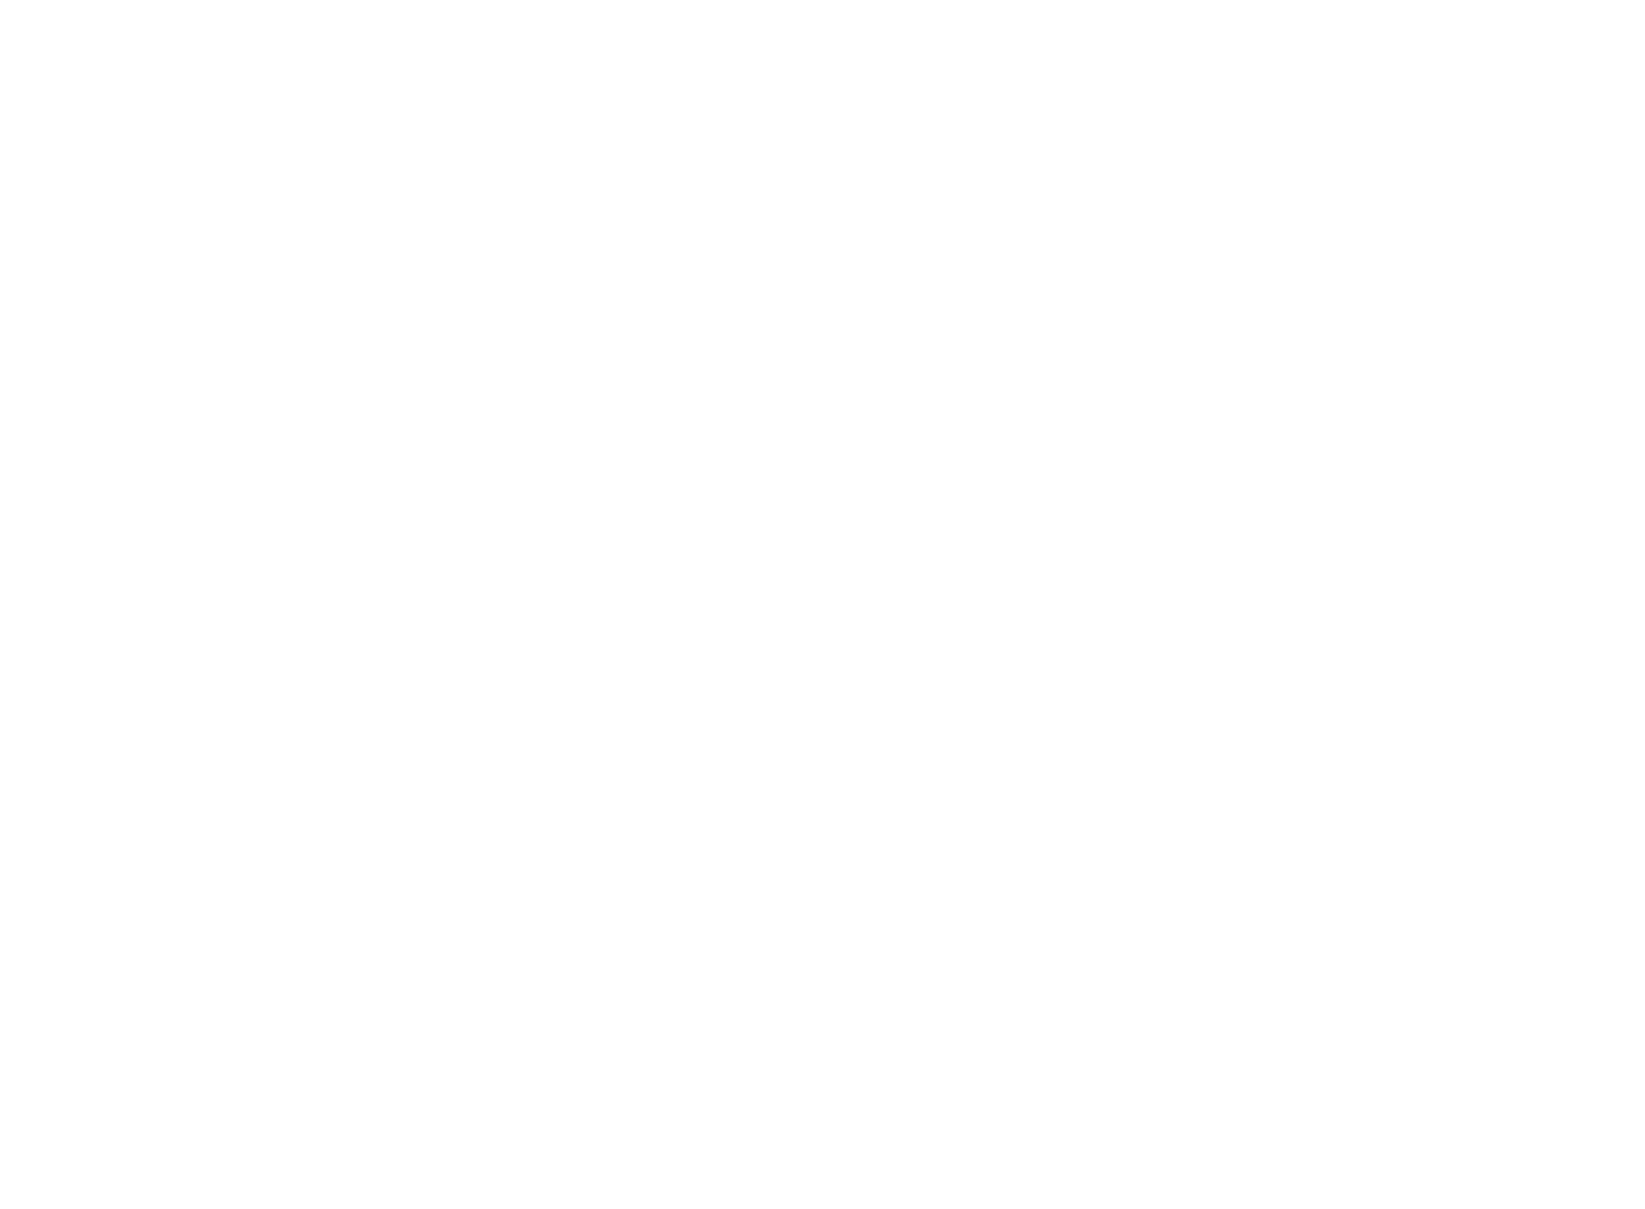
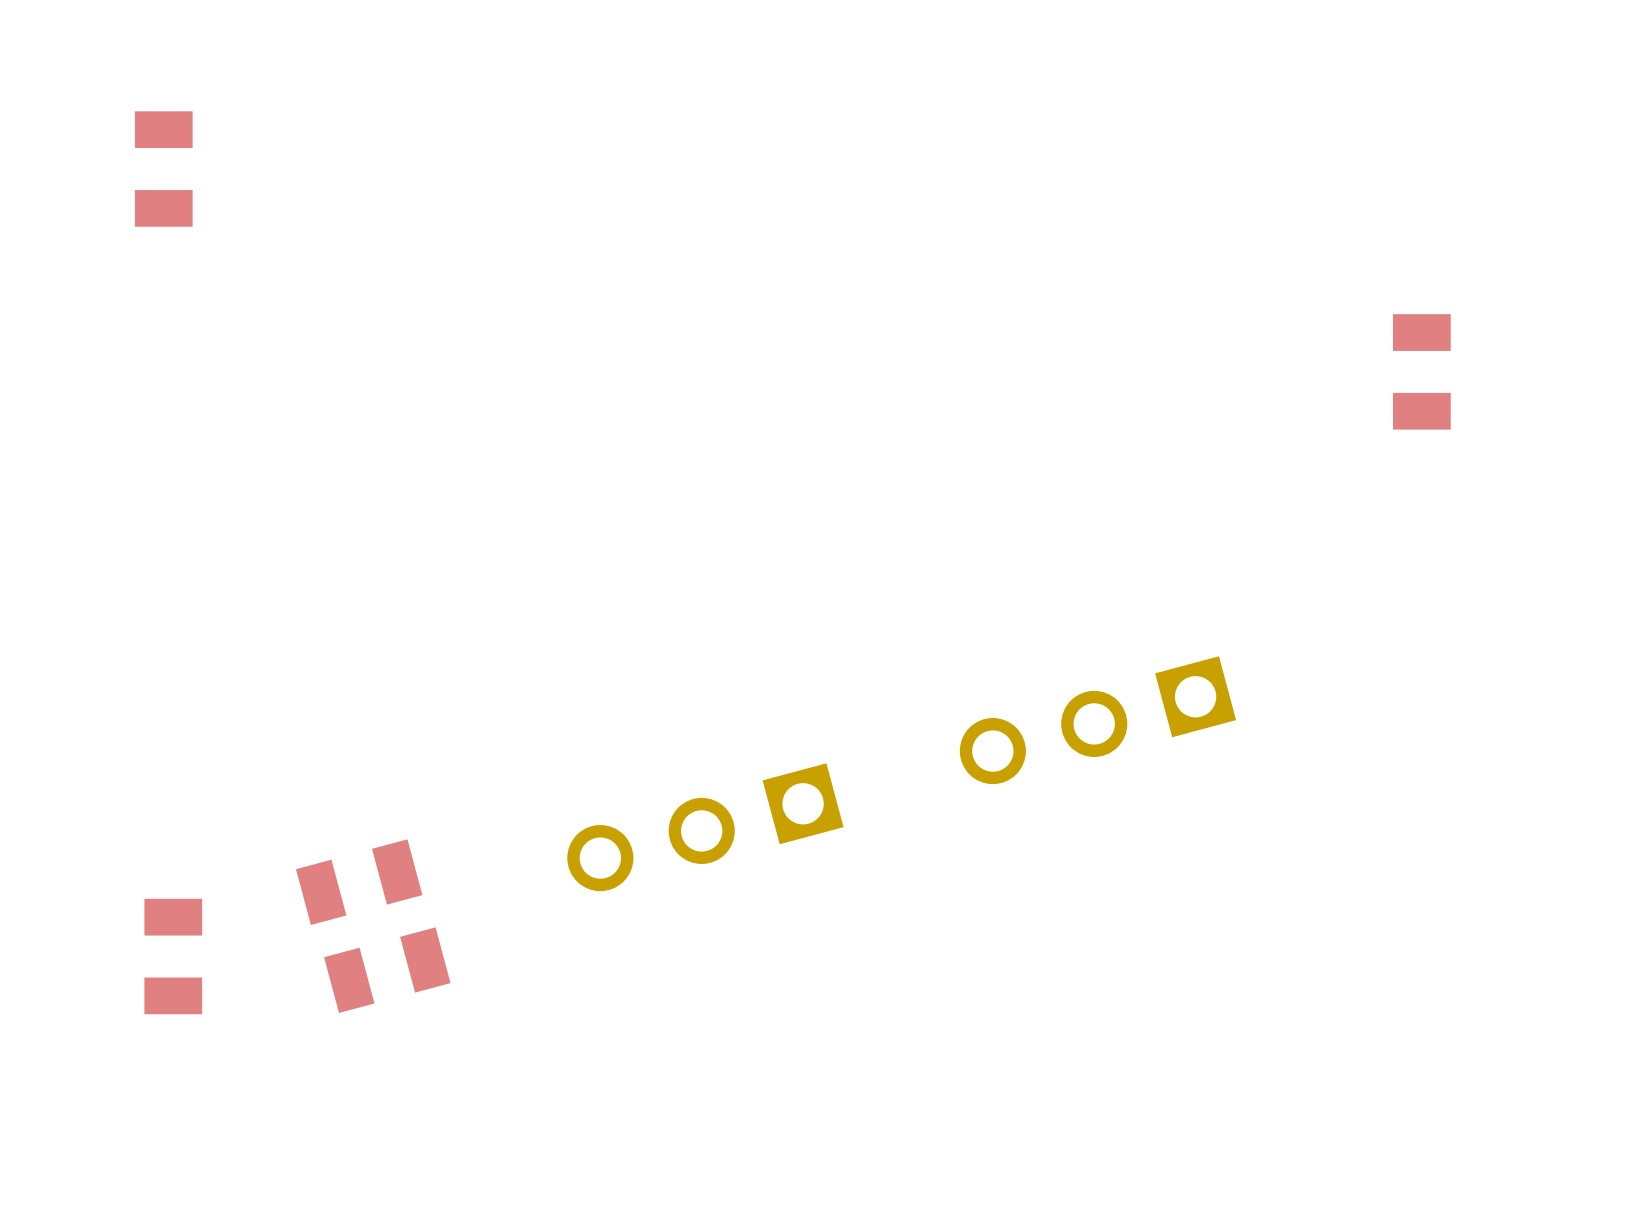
part: none -> (163, 169)
part: none -> (1421, 371)
part: none -> (1097, 720)
part: none -> (705, 827)
part: none -> (359, 882)
part: none -> (173, 956)
part: none -> (387, 970)

